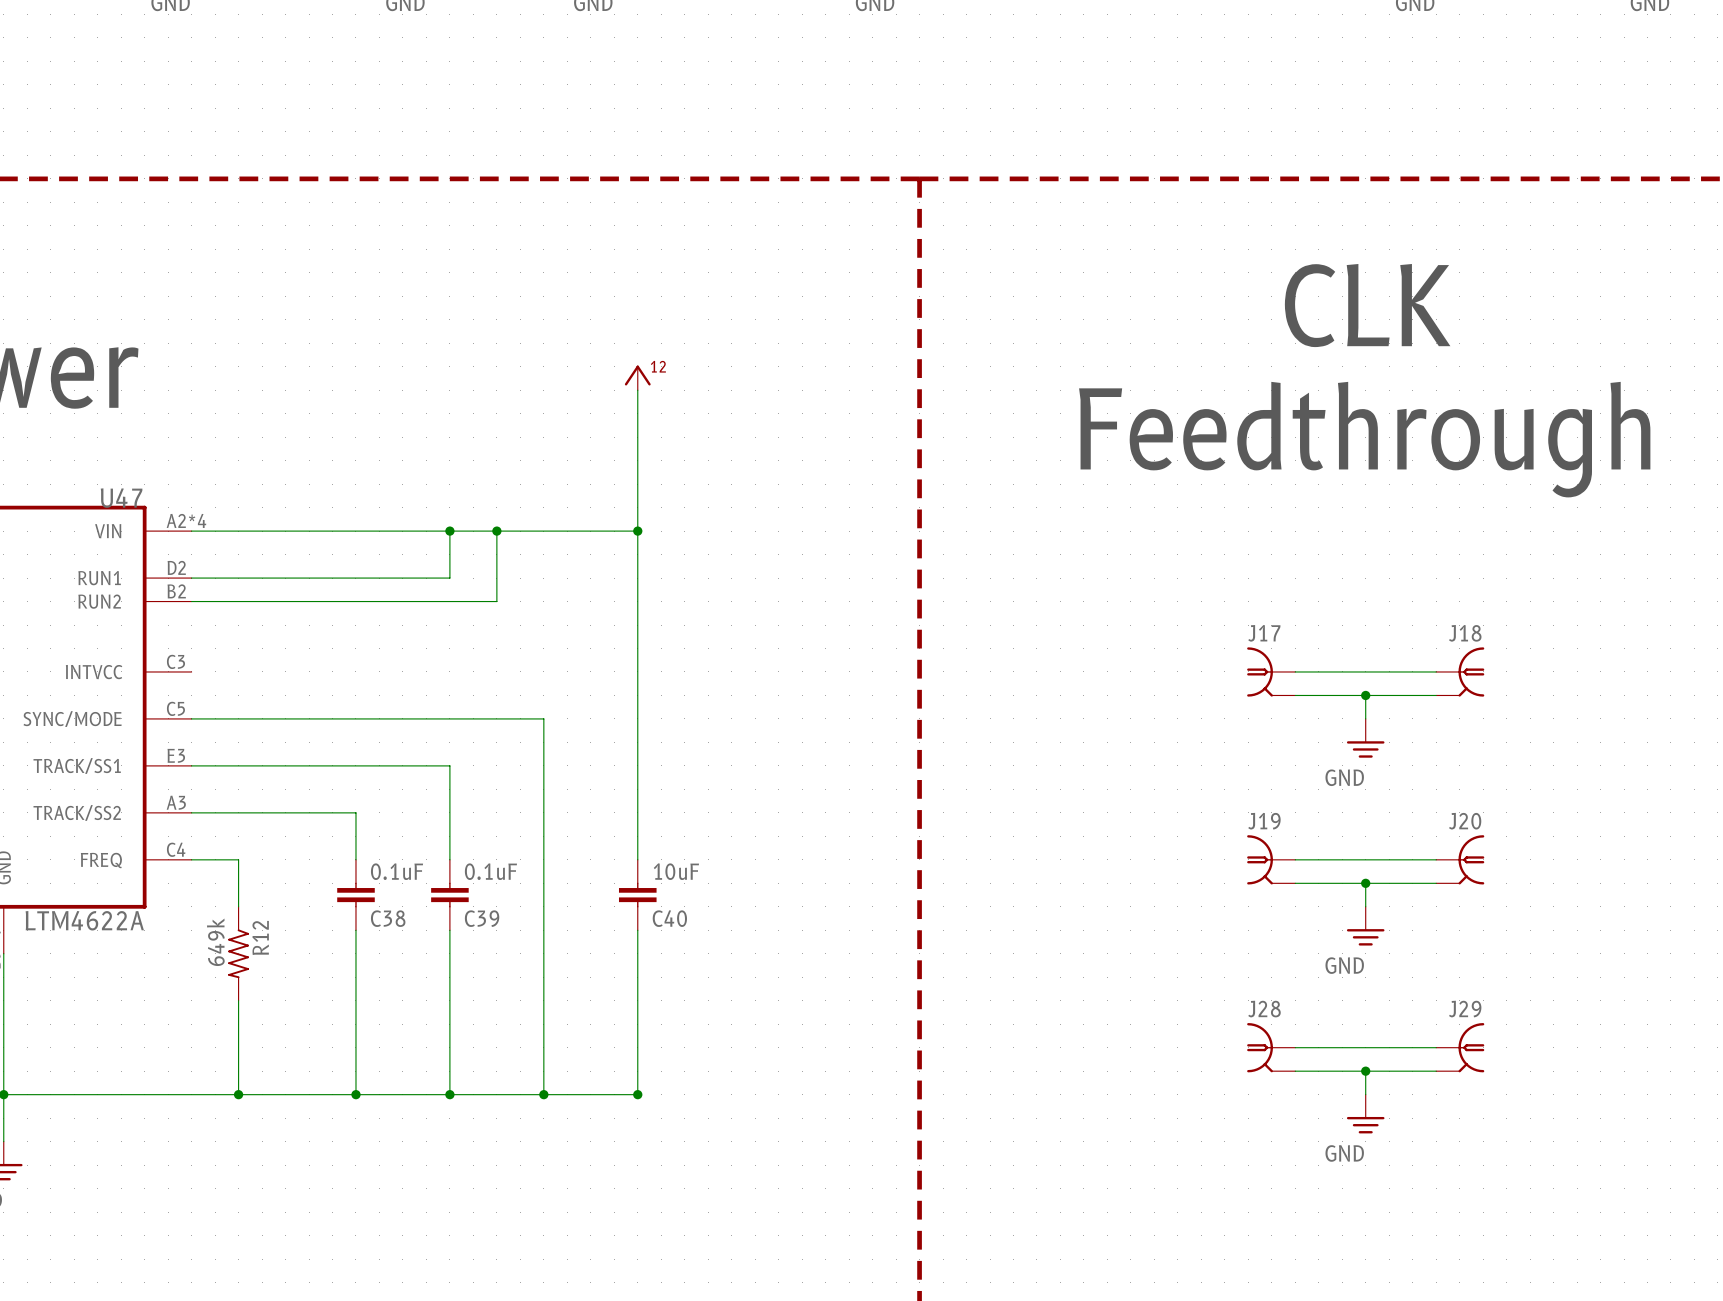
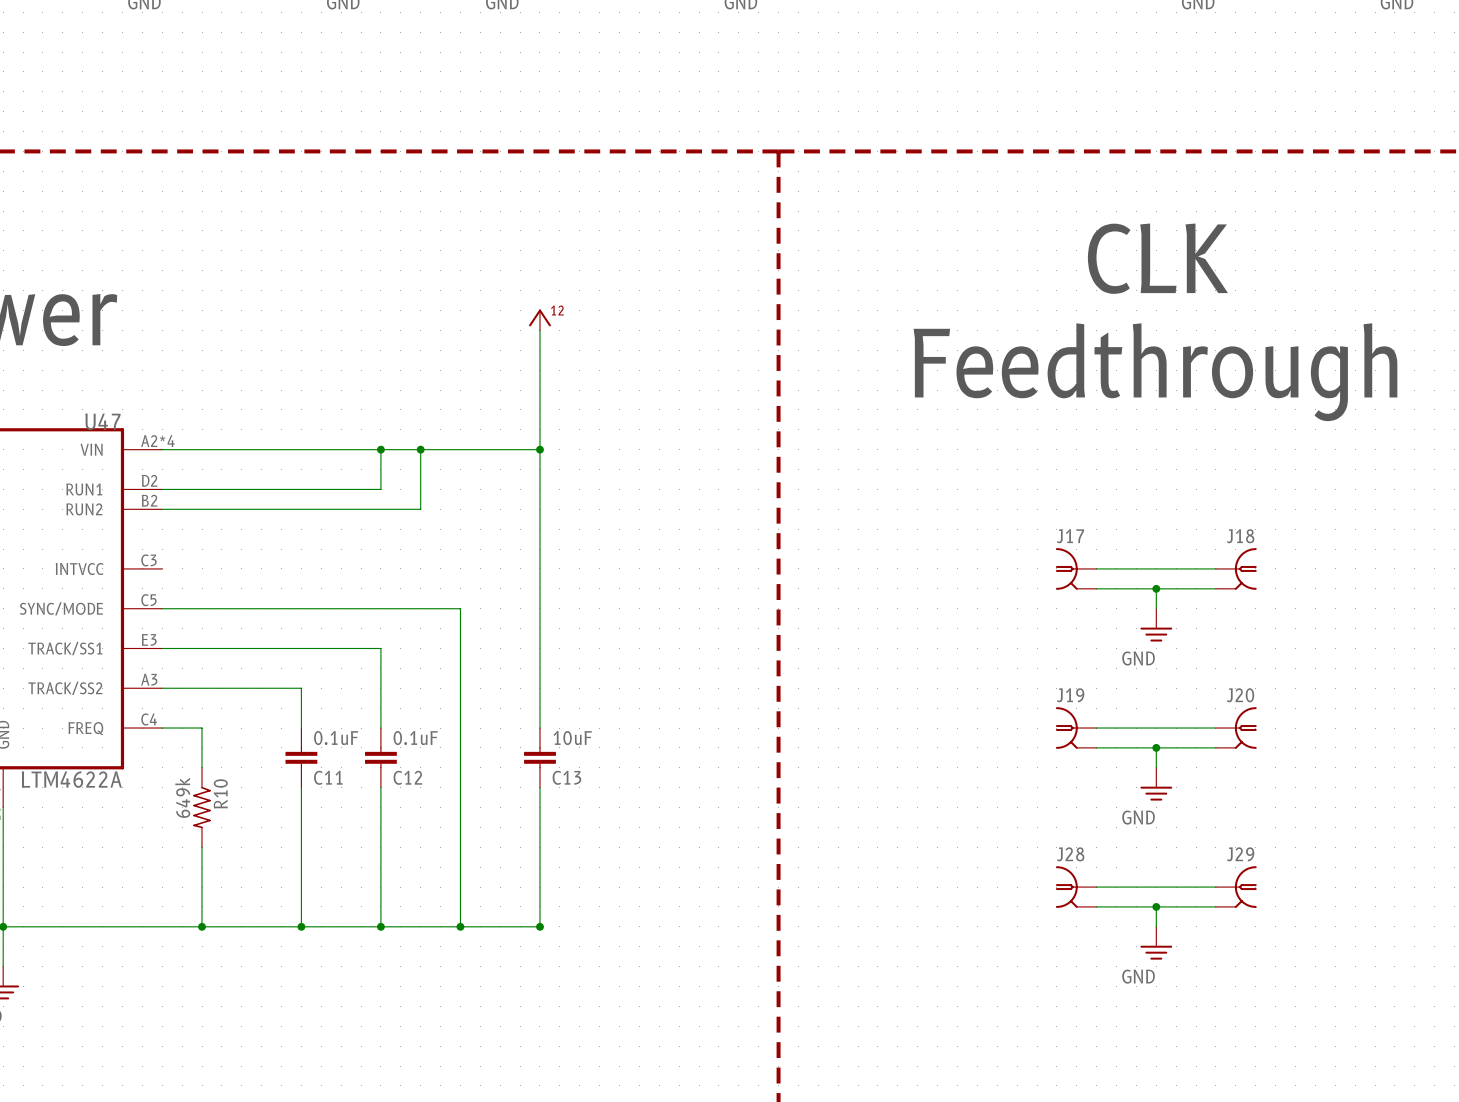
C38 name: C38 (388, 918) -> C11 (328, 777)
C39 name: C39 (482, 918) -> C12 (407, 777)
C40 name: C40 (669, 918) -> C13 (566, 777)
R12 name: R12 (260, 937) -> R10 (220, 793)

